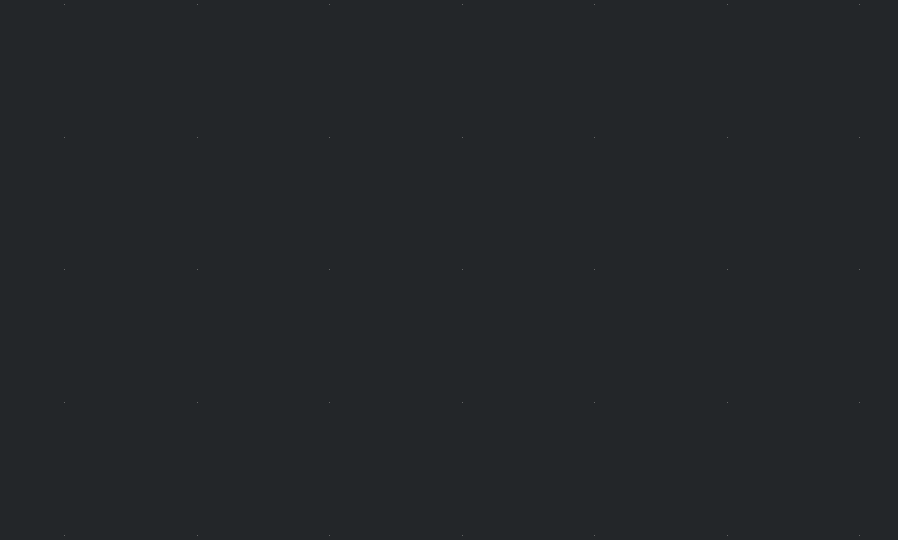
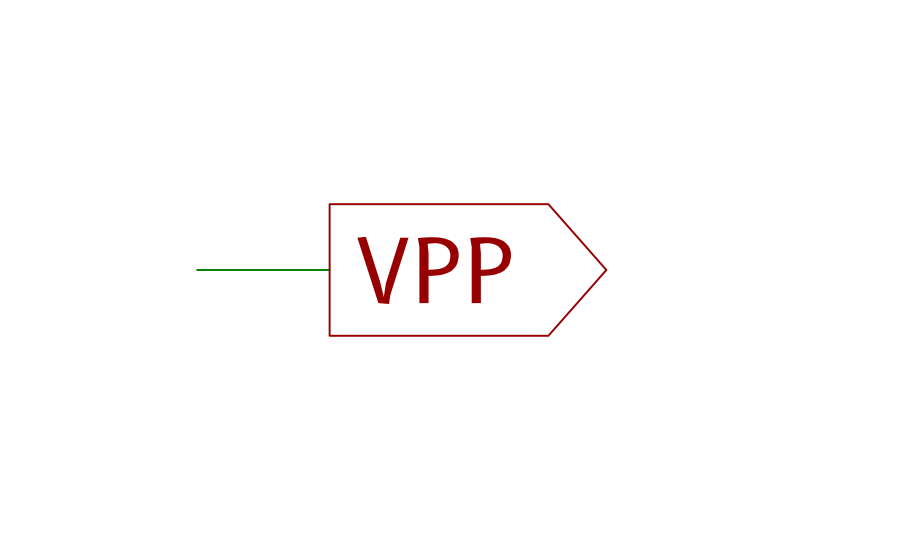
wire: none -> (197, 269) (329, 269)
global label: none -> VPP (434, 270)

